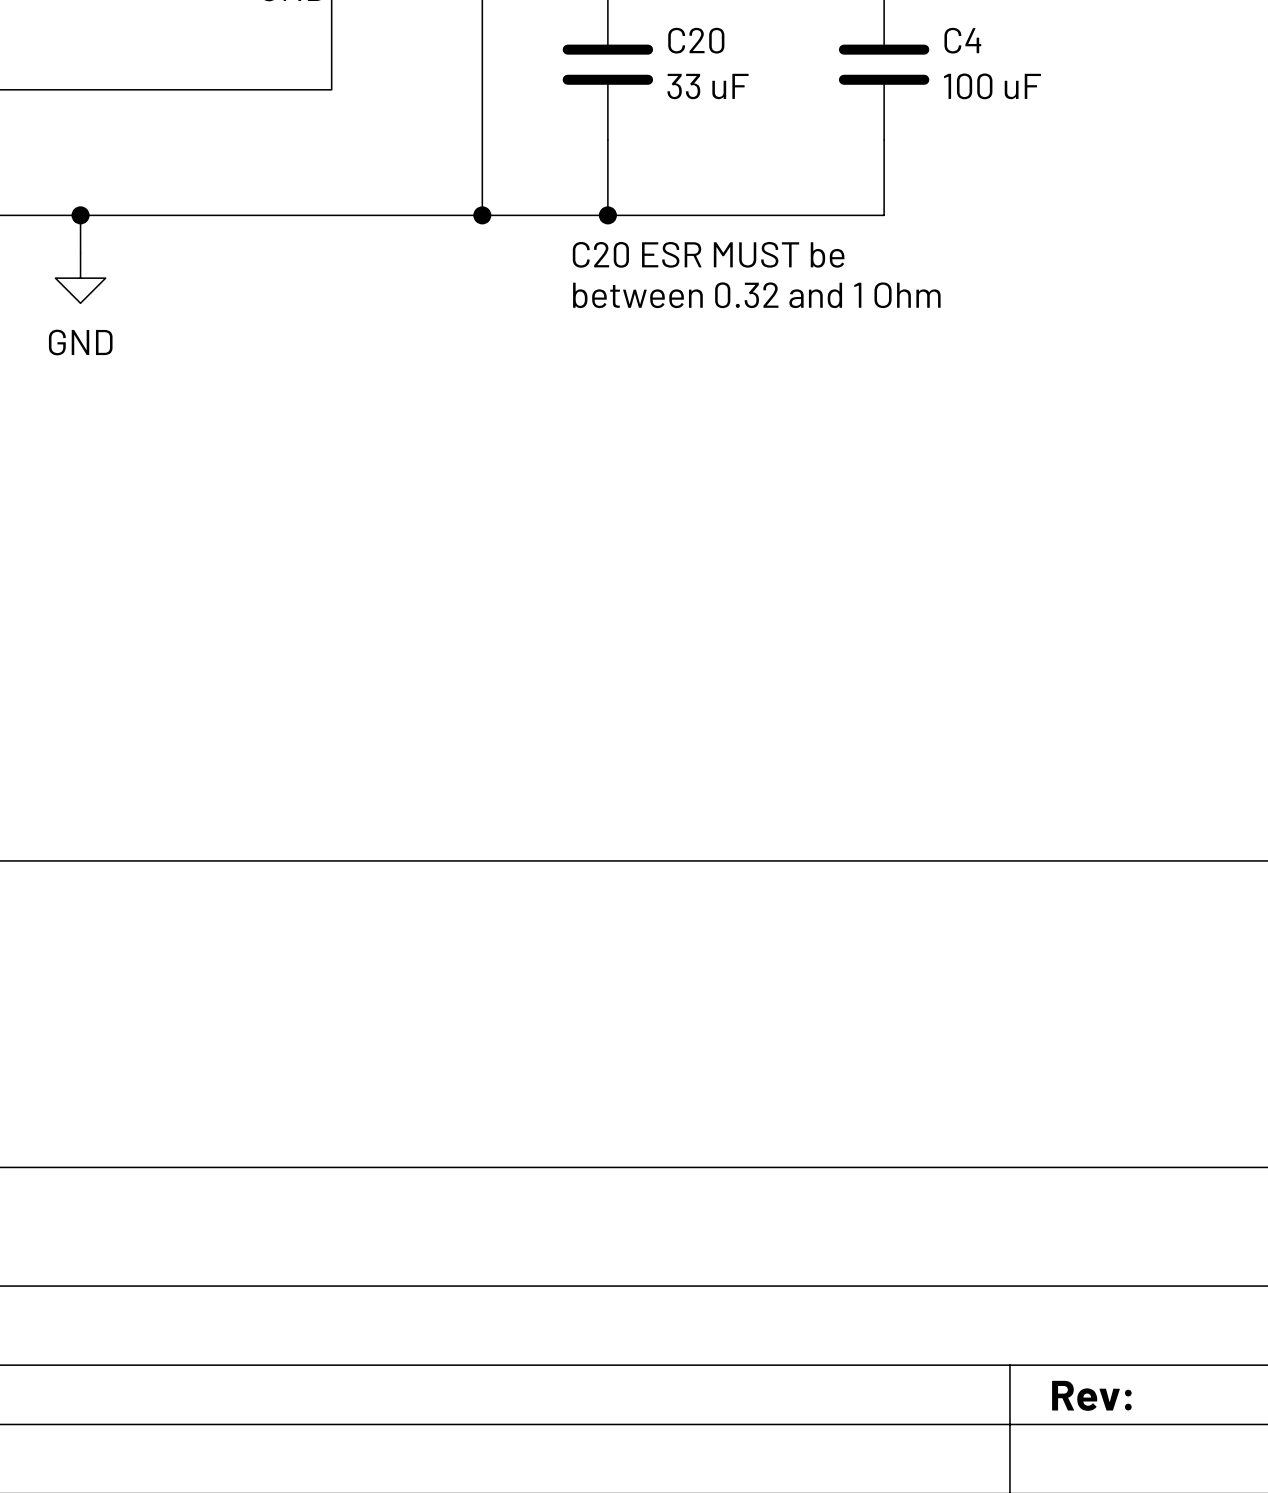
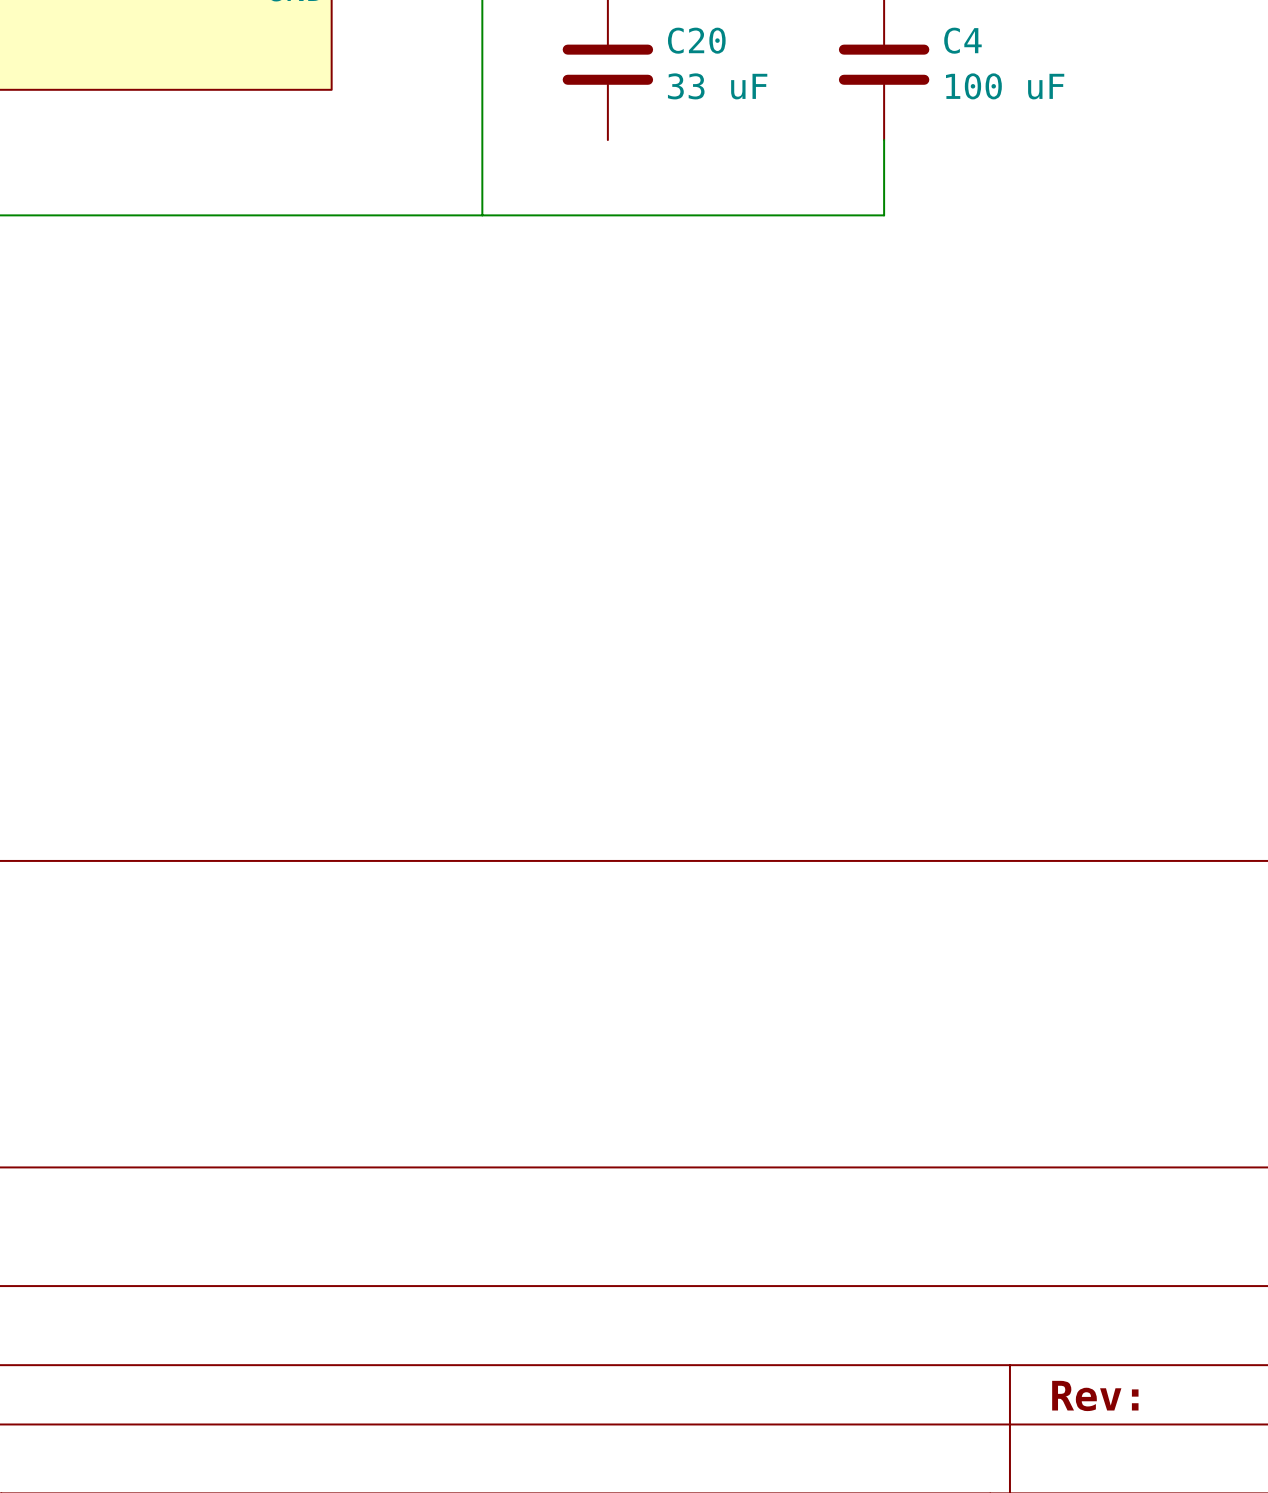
wire: (607, 140) (607, 215) -> none
wire: (80, 215) (80, 253) -> none
junction: (80, 215) -> none
junction: (482, 215) -> none
junction: (607, 215) -> none
text: C20 ESR MUST be (708, 254) -> none
power symbol: GND (80, 278) -> none
text: between 0.32 and 1 Ohm (756, 295) -> none

